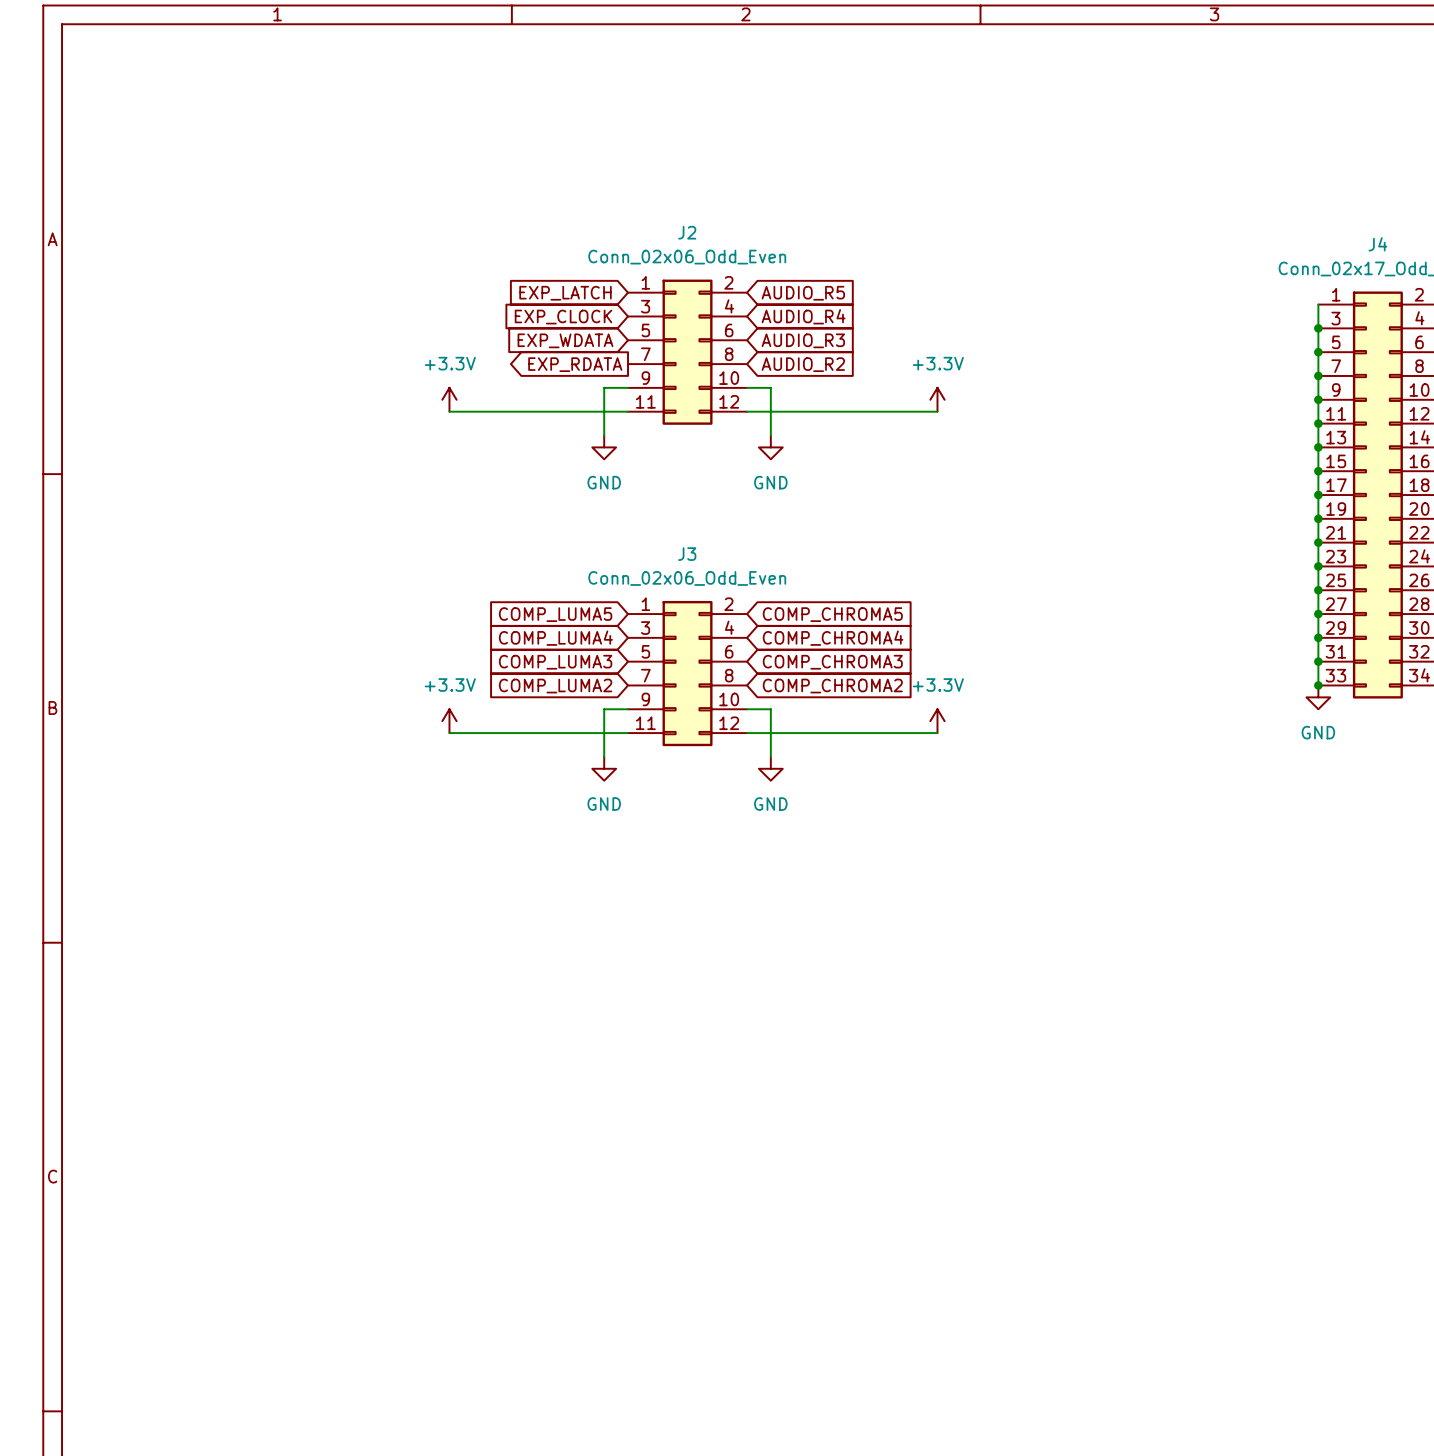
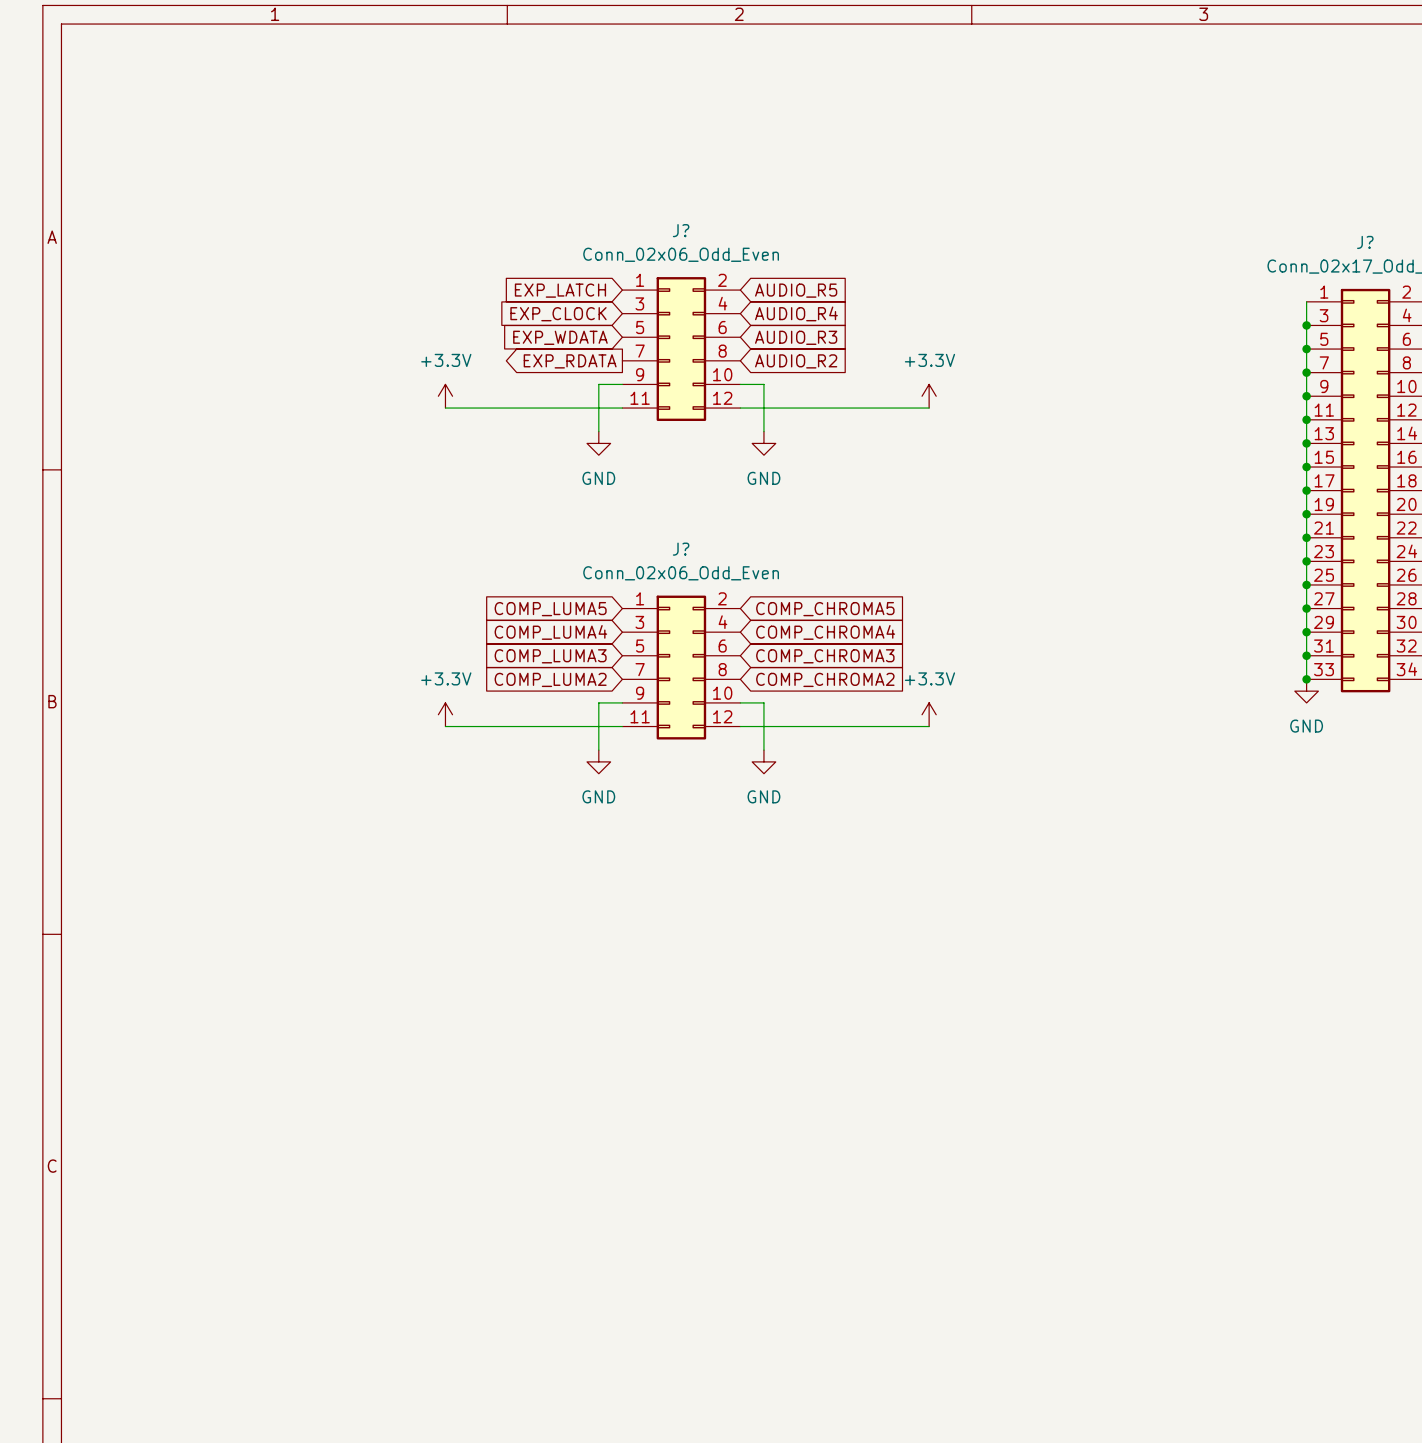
J2 name: J2 (687, 232) -> J? (681, 230)
J4 name: J4 (1377, 244) -> J? (1365, 242)
J3 name: J3 (687, 554) -> J? (681, 549)

